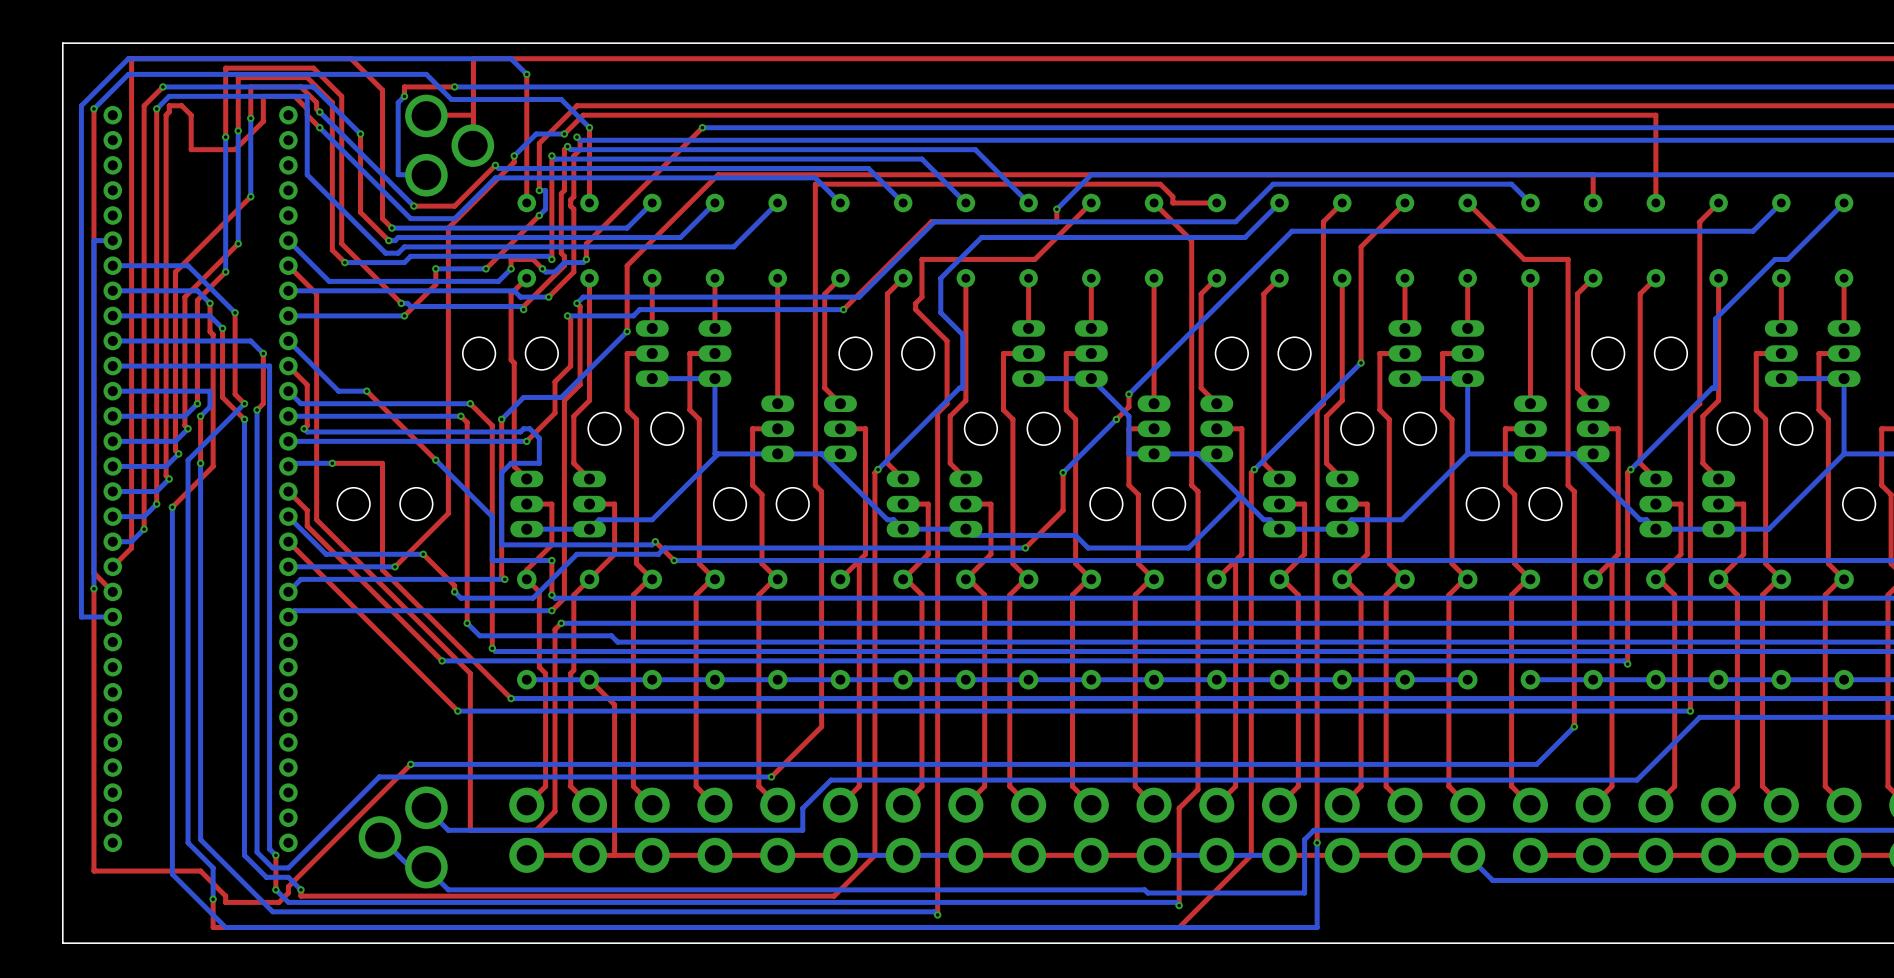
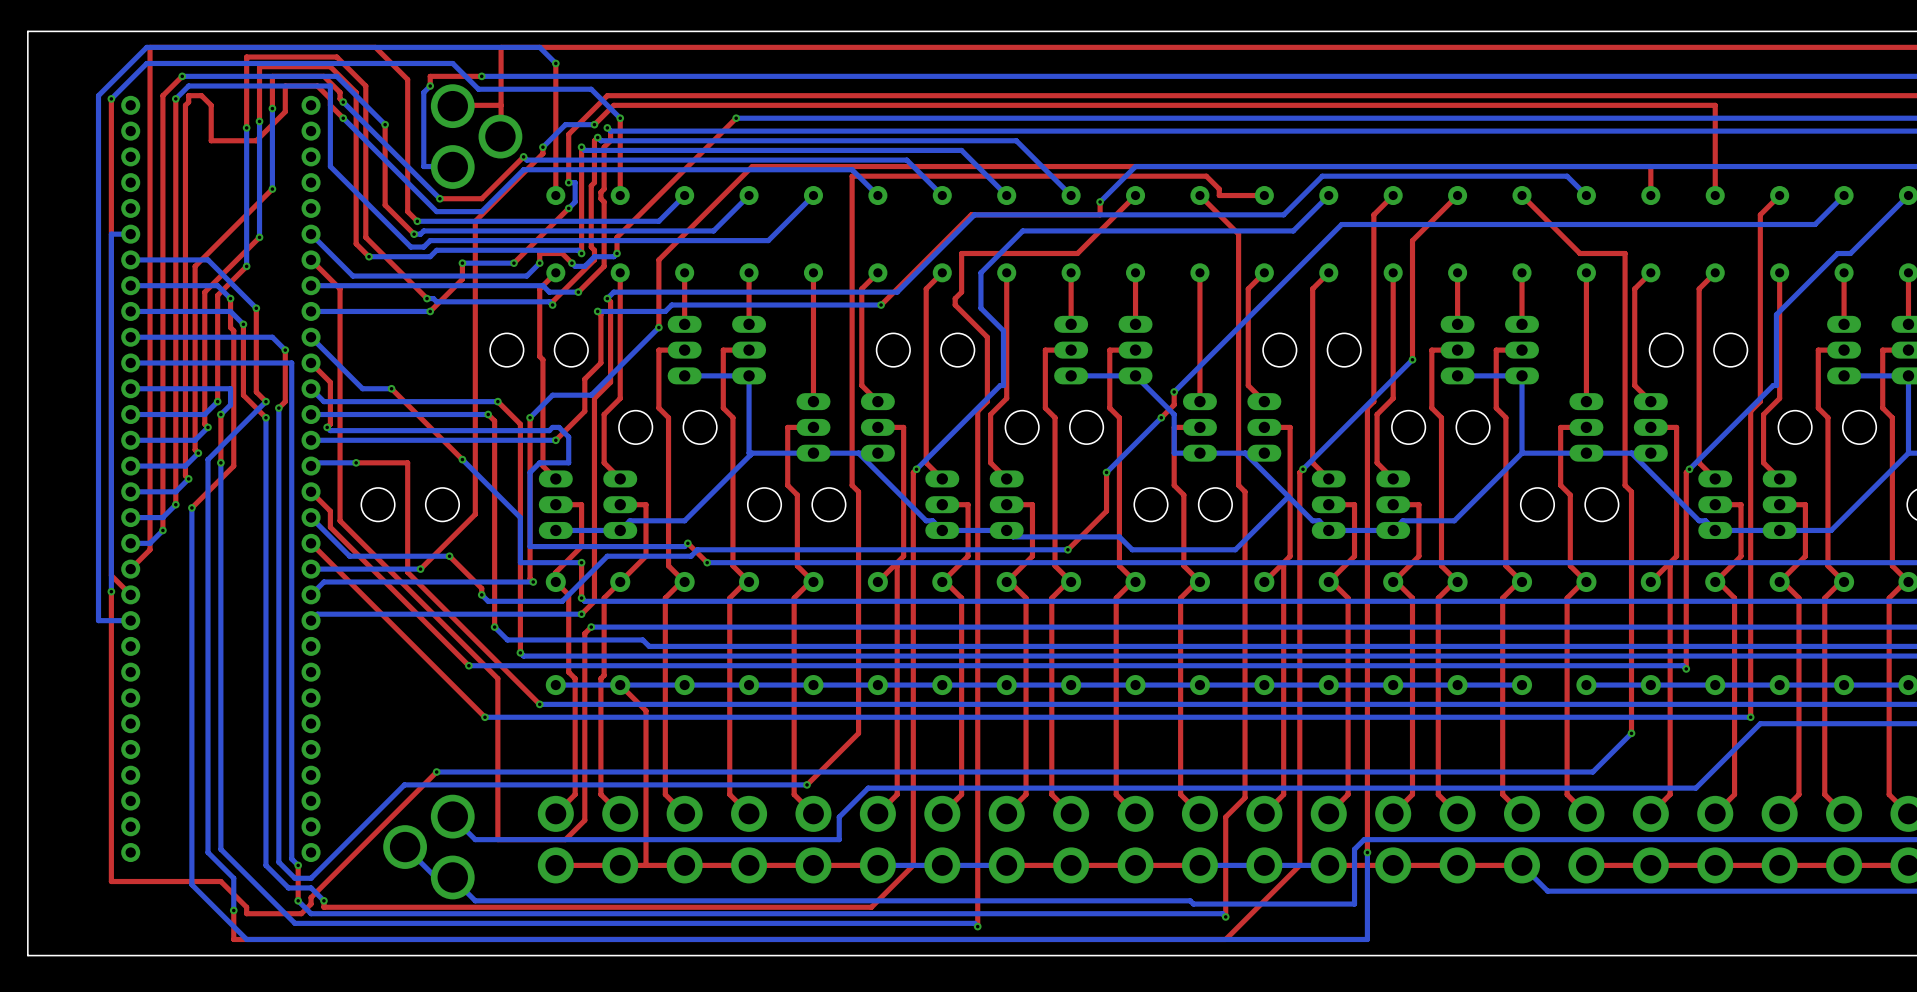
board edge: (62, 43) (62, 943) -> (79, 31) (27, 31) (27, 955) (79, 955)

